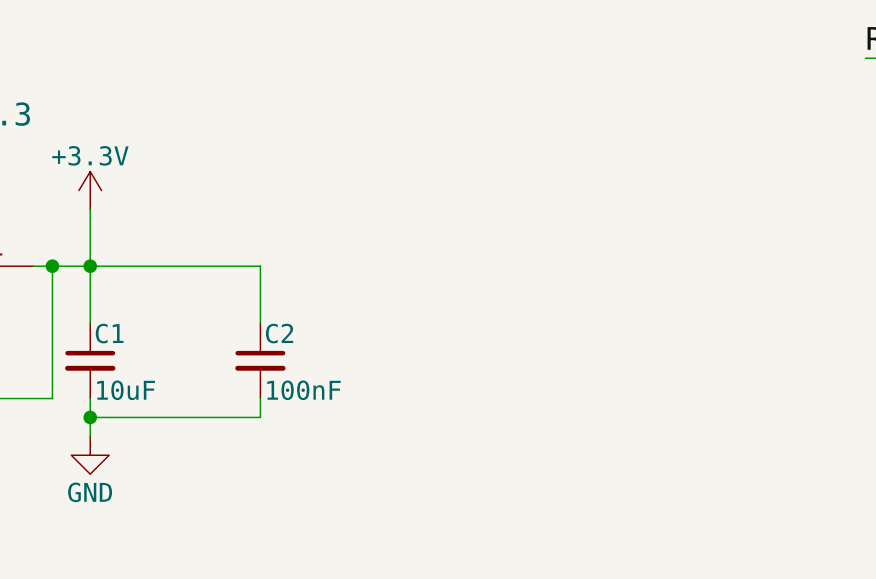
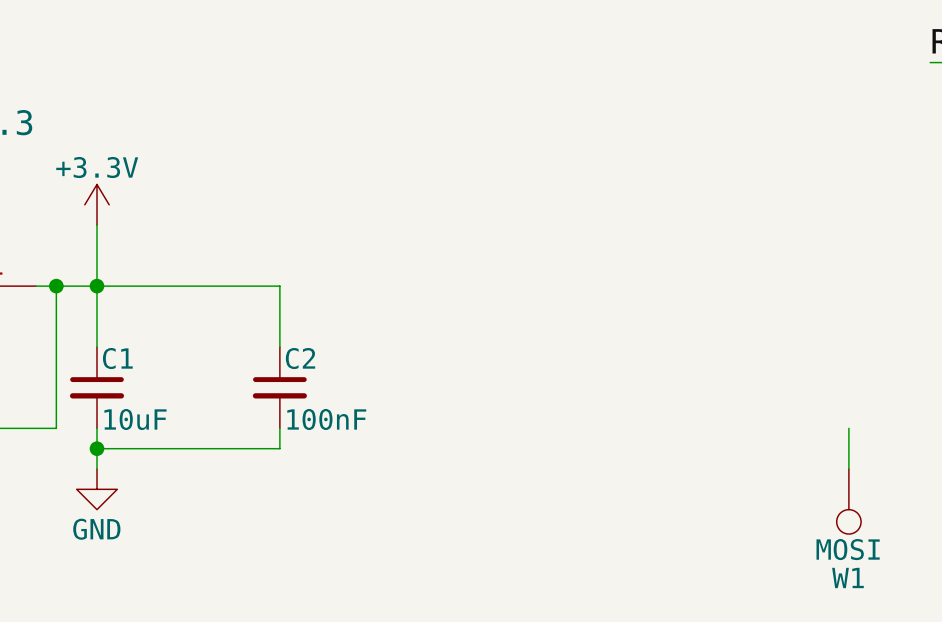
wire: none -> (848, 428) (848, 469)
W1: none -> MOSI (848, 501)

